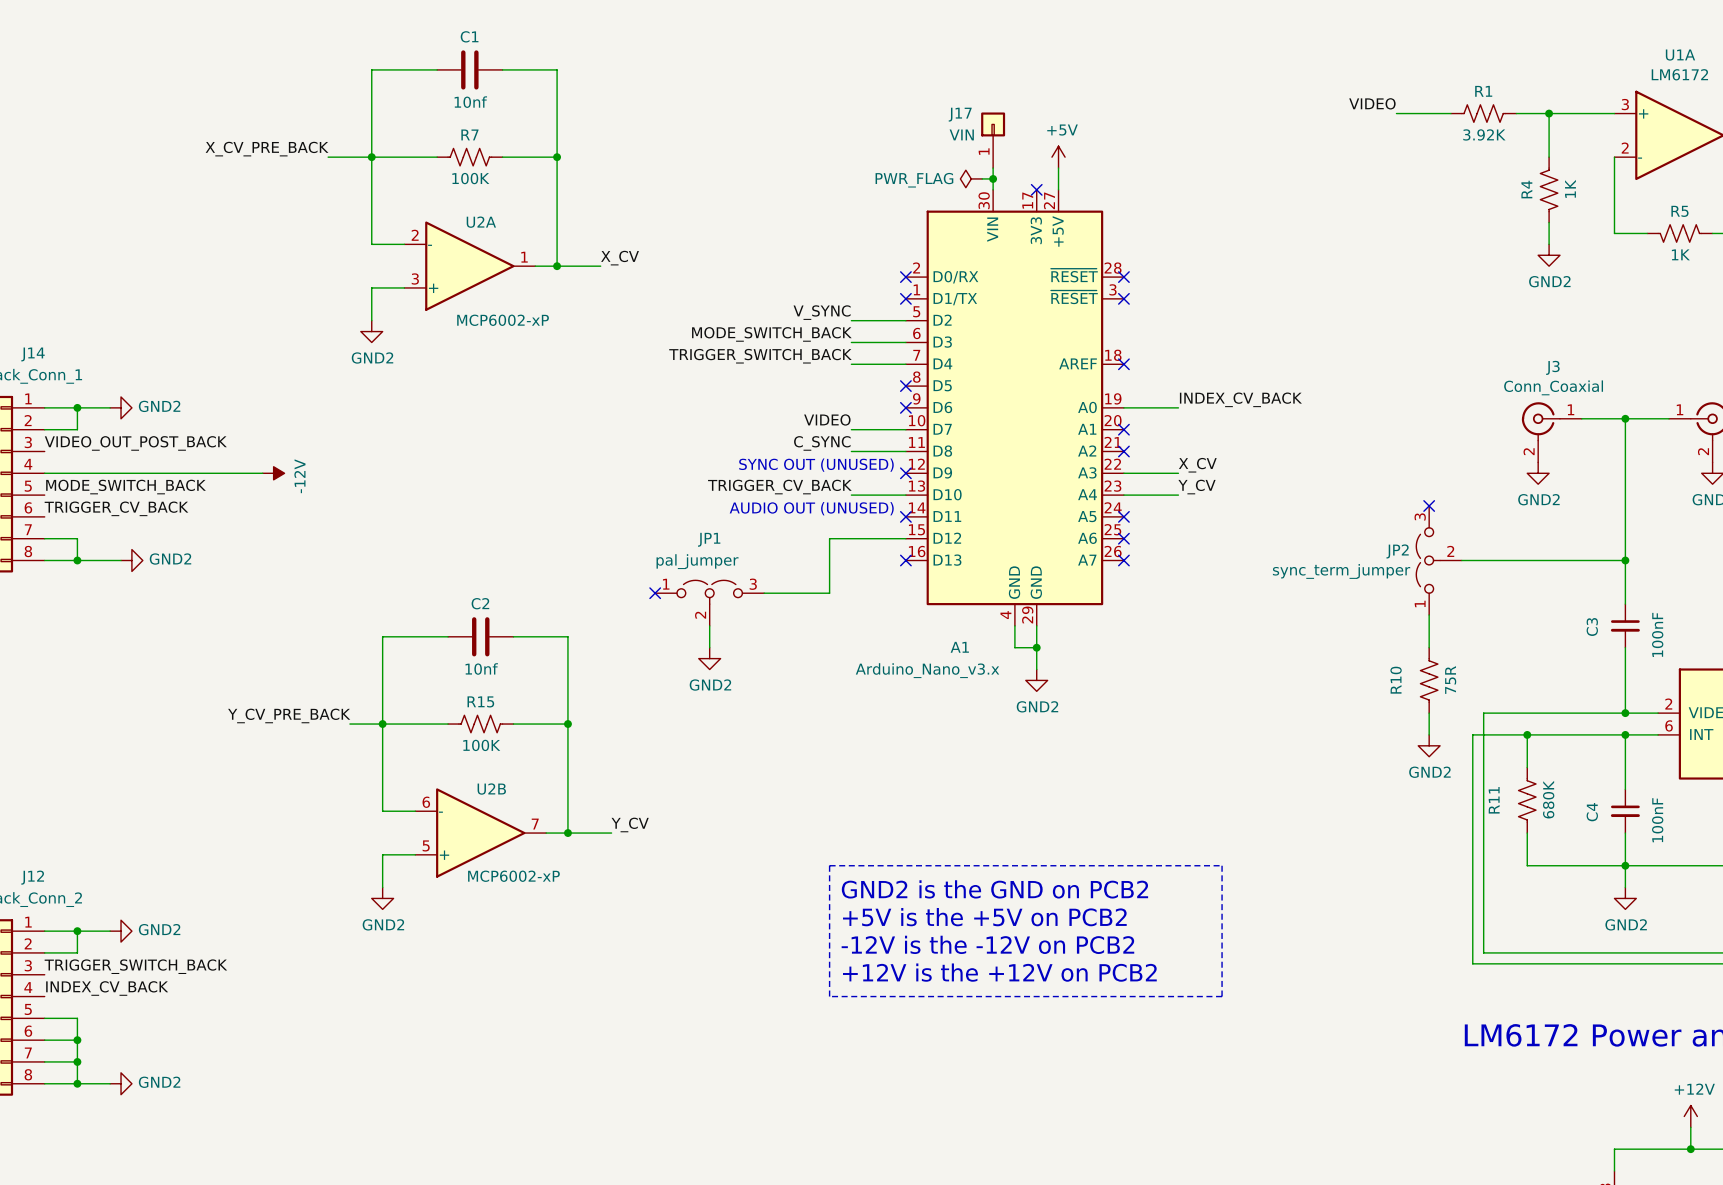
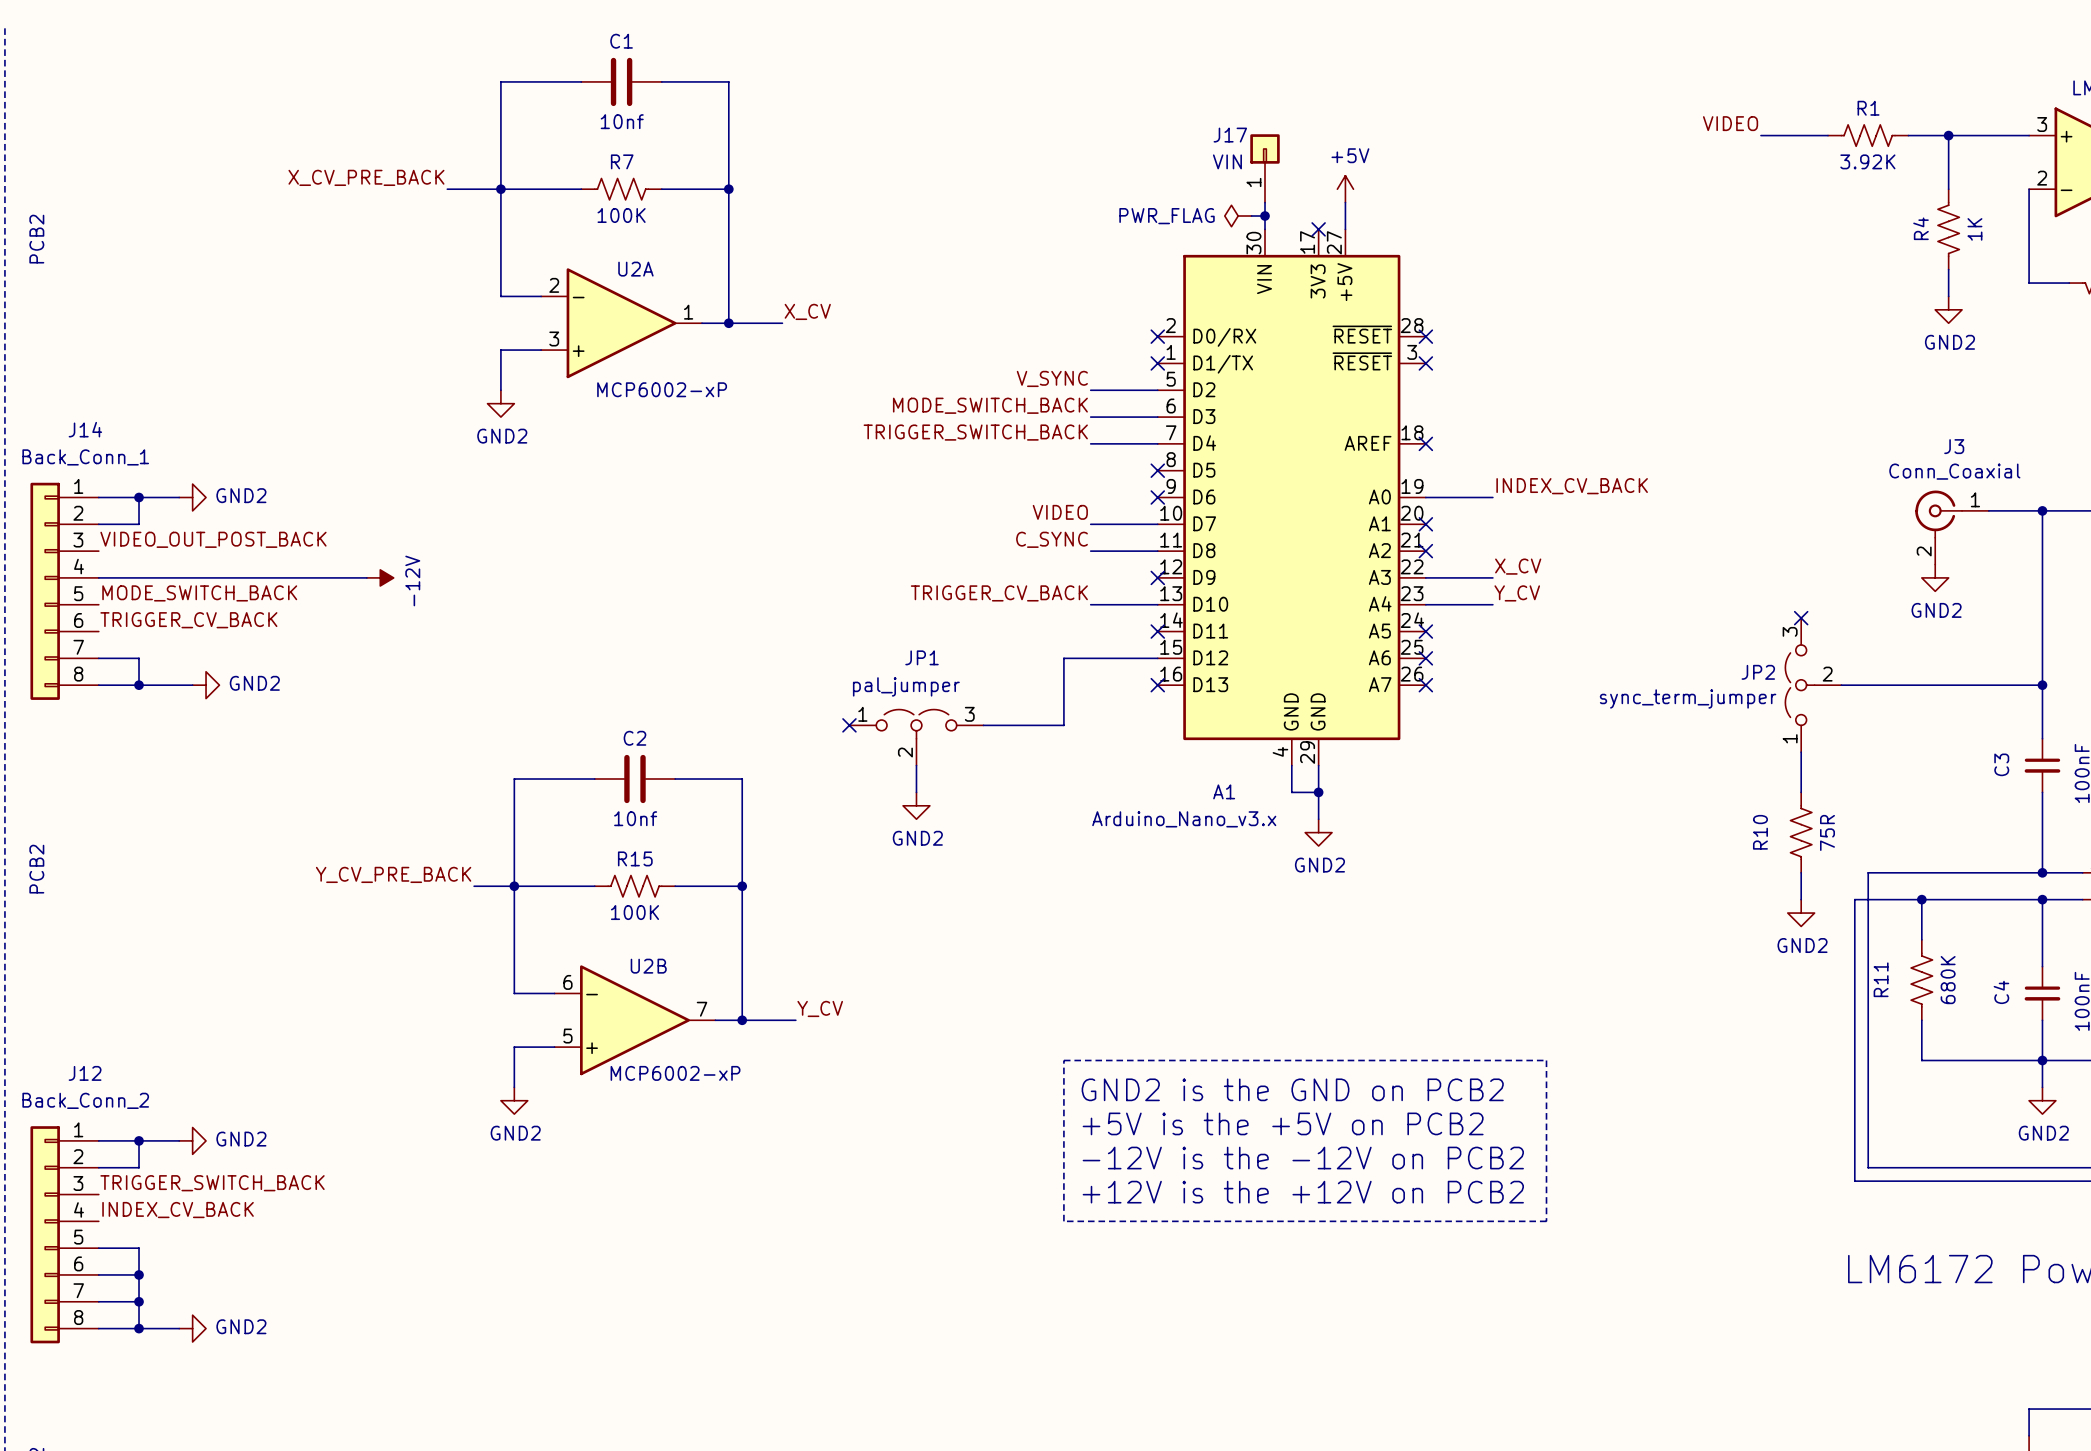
text: SYNC OUT (UNUSED) (816, 465) -> none
text: AUDIO OUT (UNUSED) (811, 508) -> none

